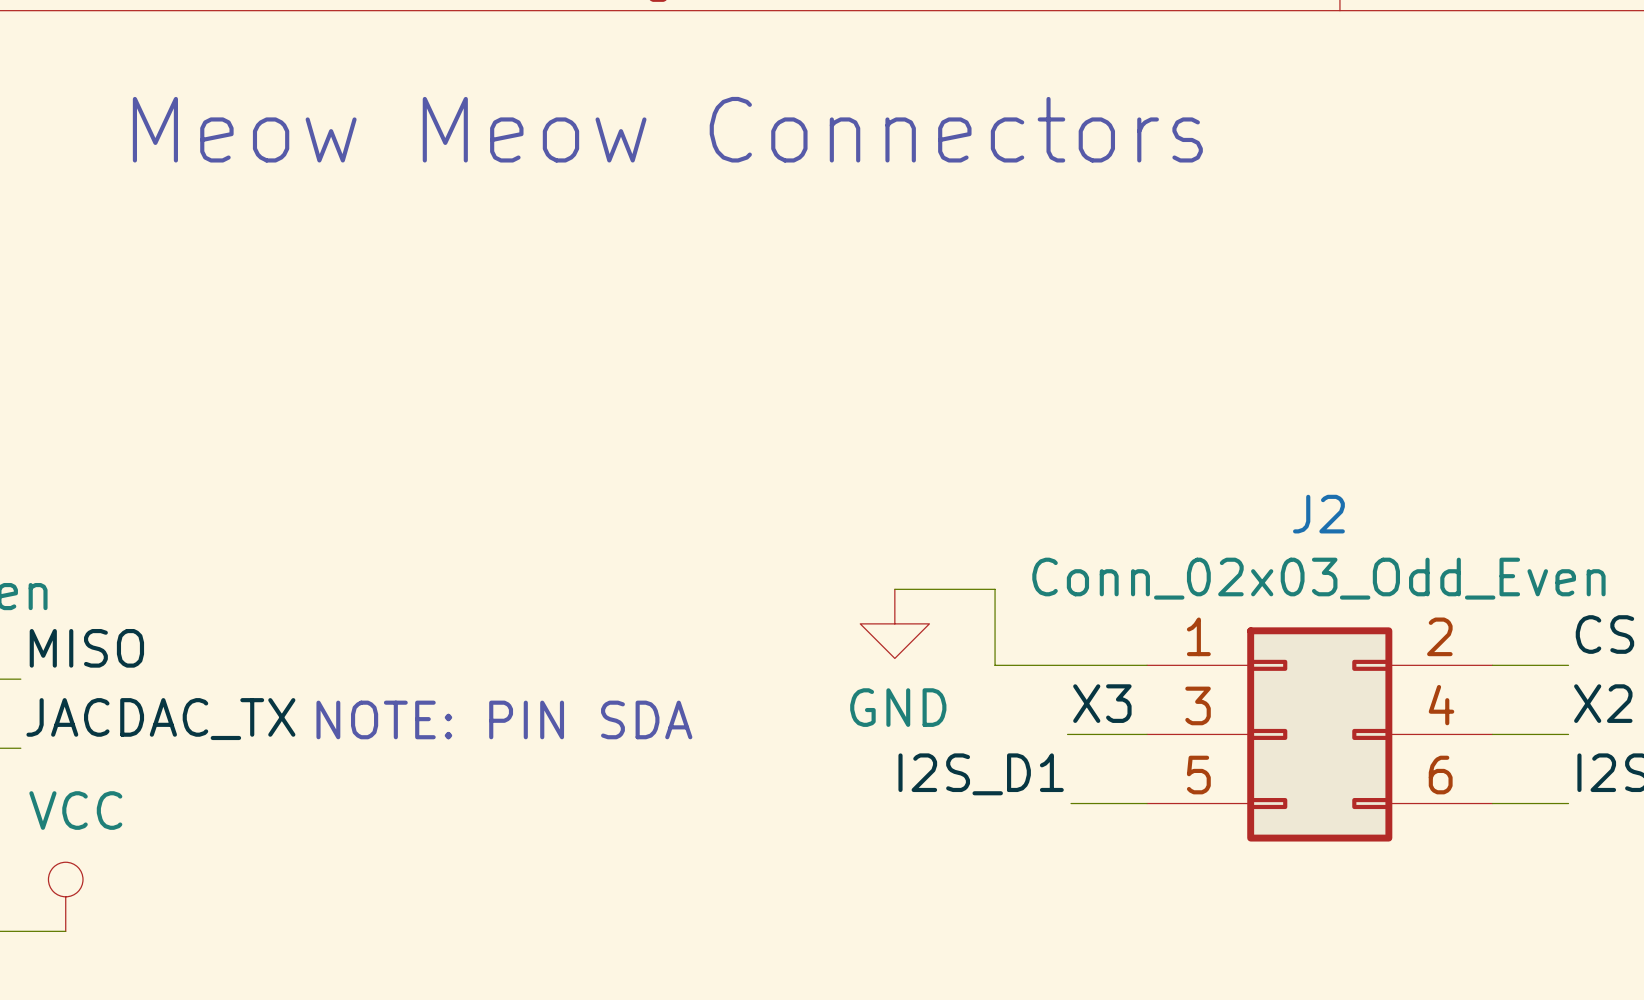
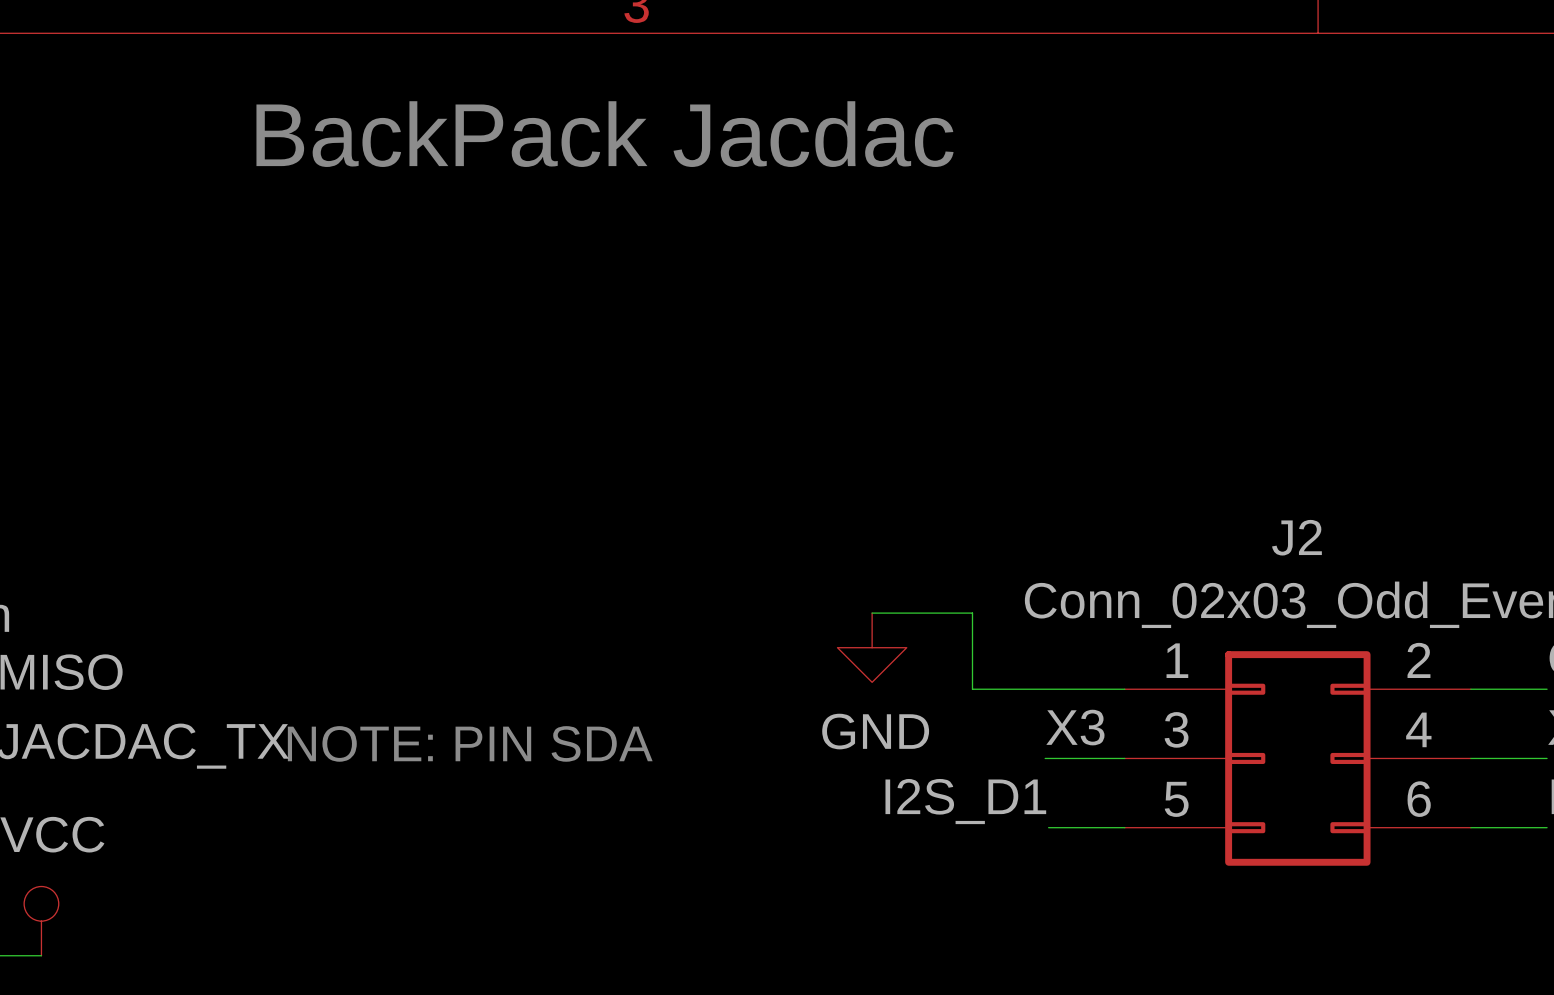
text: none -> BackPack Jacdac (605, 134)
text: Meow Meow Connectors (667, 129) -> none

